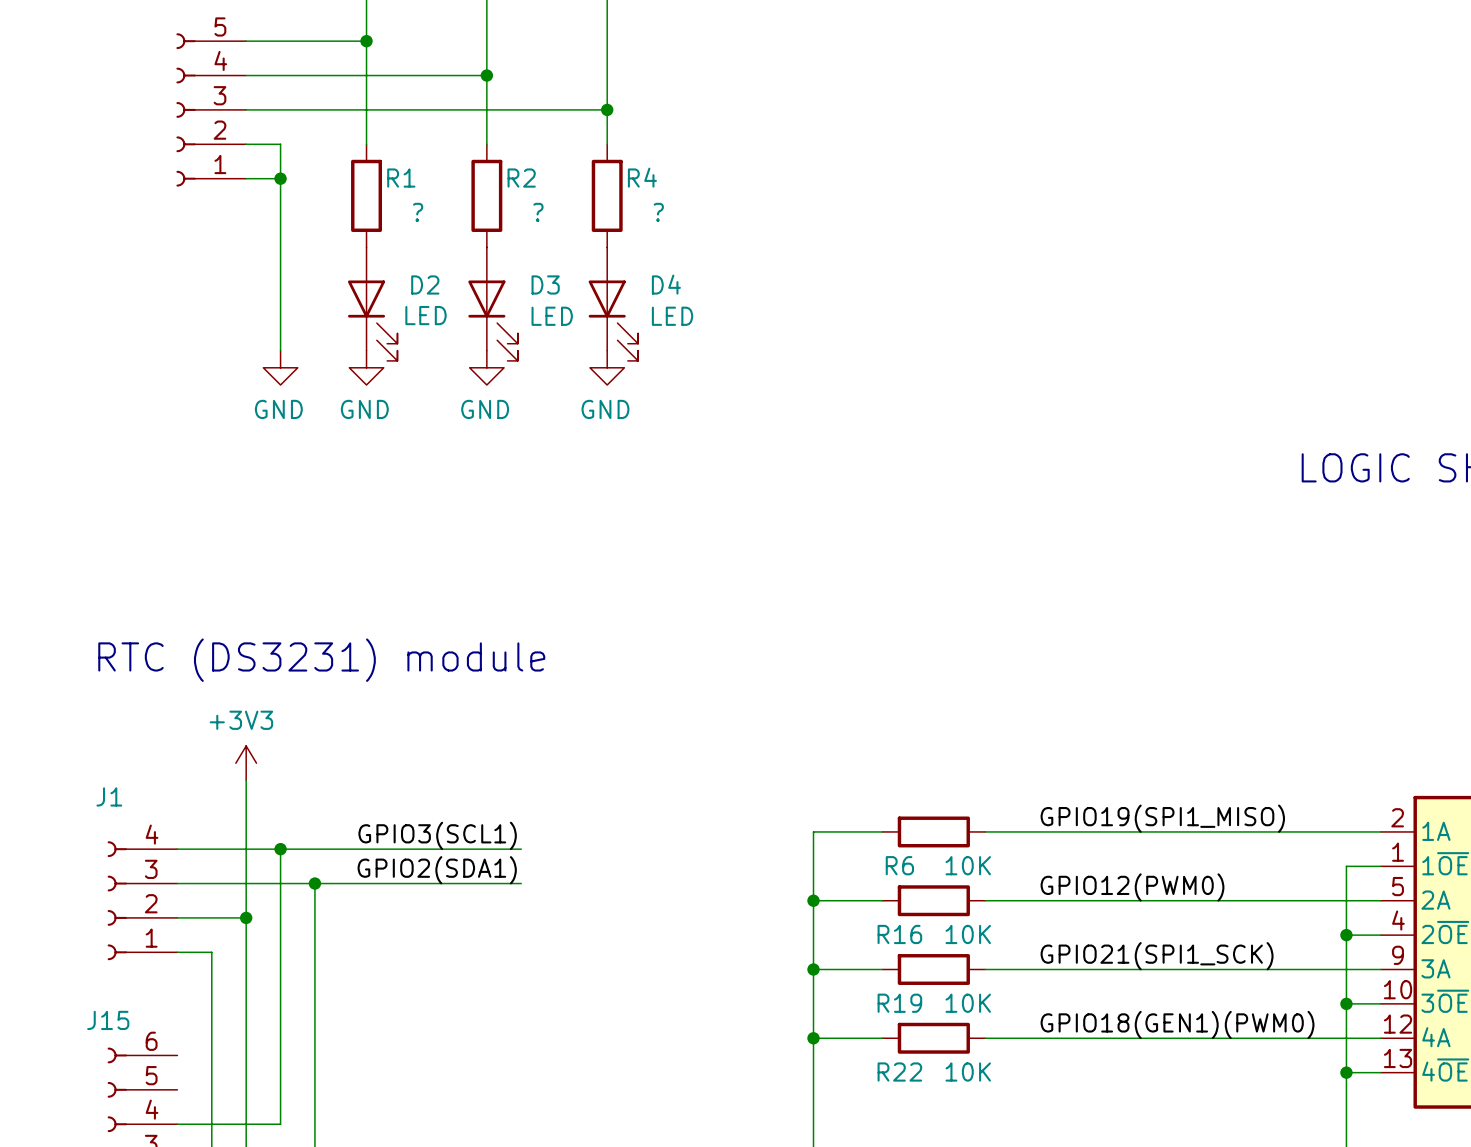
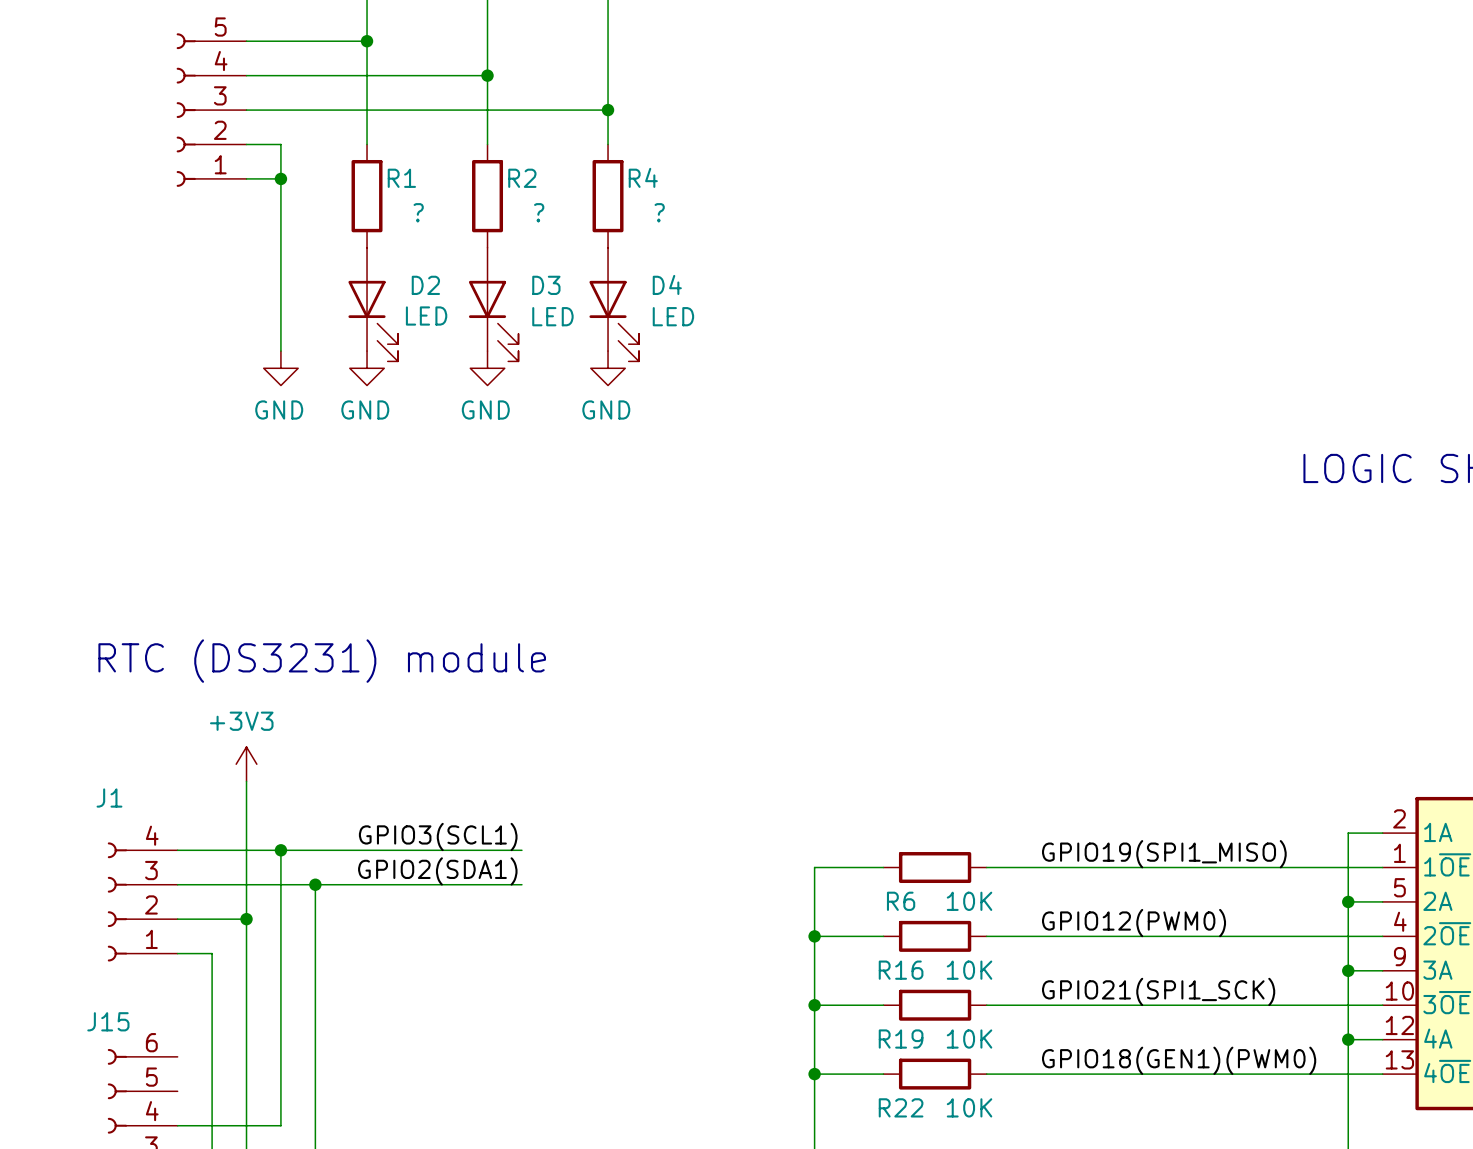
label position: GPIO19(SPI1_MISO) (1162, 818) -> GPIO19(SPI1_MISO) (1164, 854)
wire: (882, 831) (813, 831) (813, 866) -> (883, 867) (814, 867)
R6 position: (933, 831) -> (935, 867)
wire: (985, 831) (1346, 831) -> (986, 867) (1348, 867) (1348, 833)
label position: GPIO12(PWM0) (1132, 887) -> GPIO12(PWM0) (1134, 923)
wire: (813, 900) (882, 900) -> (814, 936) (883, 936)
junction: (813, 900) -> none
R16 position: (933, 900) -> (935, 936)
wire: (985, 900) (1346, 900) -> (986, 936) (1348, 936)
junction: none -> (1348, 901)
junction: none -> (814, 936)
junction: (1346, 935) -> none
label position: GPIO21(SPI1_SCK) (1157, 956) -> GPIO21(SPI1_SCK) (1158, 991)
wire: (813, 969) (882, 969) -> (814, 1005) (883, 1005)
junction: (813, 969) -> none
R19 position: (933, 969) -> (935, 1005)
wire: (985, 969) (1346, 969) -> (986, 1005) (1348, 1005)
junction: none -> (1348, 970)
junction: none -> (814, 1005)
junction: (1346, 1003) -> none
label position: GPIO18(GEN1)(PWM0) (1177, 1024) -> GPIO18(GEN1)(PWM0) (1179, 1060)
wire: (813, 1038) (882, 1038) -> (814, 1074) (883, 1074)
junction: (813, 1038) -> none
R22 position: (933, 1038) -> (935, 1074)
wire: (985, 1038) (1346, 1038) -> (986, 1074) (1348, 1074)
junction: none -> (1348, 1039)
junction: none -> (814, 1074)
junction: (1346, 1072) -> none

